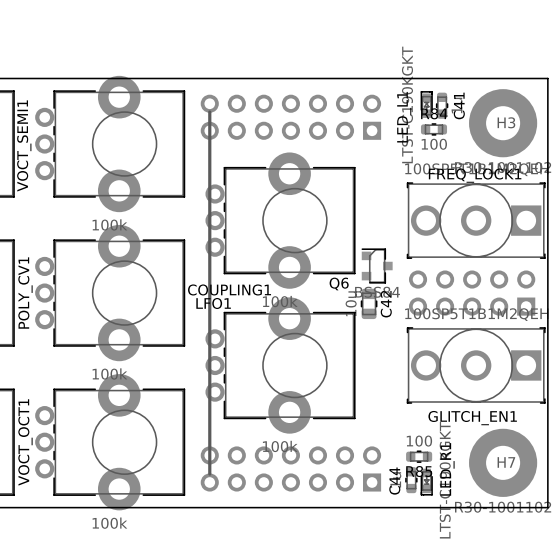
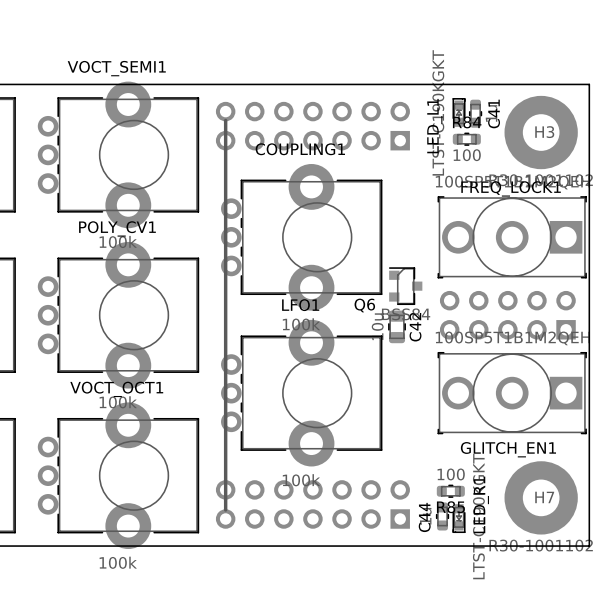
VOCT_SEMI1 name rotation: 0° (24, 145) -> 90° clockwise (116, 68)
VOCT_SEMI1 name position: VOCT_SEMI1 (24, 145) -> VOCT_SEMI1 (116, 68)
COUPLING1 name position: COUPLING1 (229, 289) -> COUPLING1 (300, 149)
POLY_CV1 name rotation: 0° (25, 293) -> 90° clockwise (117, 228)
POLY_CV1 name position: POLY_CV1 (25, 293) -> POLY_CV1 (117, 228)
LFO1 name position: LFO1 (213, 303) -> LFO1 (300, 305)
VOCT_OCT1 name rotation: 0° (25, 442) -> 90° clockwise (116, 389)
VOCT_OCT1 name position: VOCT_OCT1 (25, 442) -> VOCT_OCT1 (116, 389)

